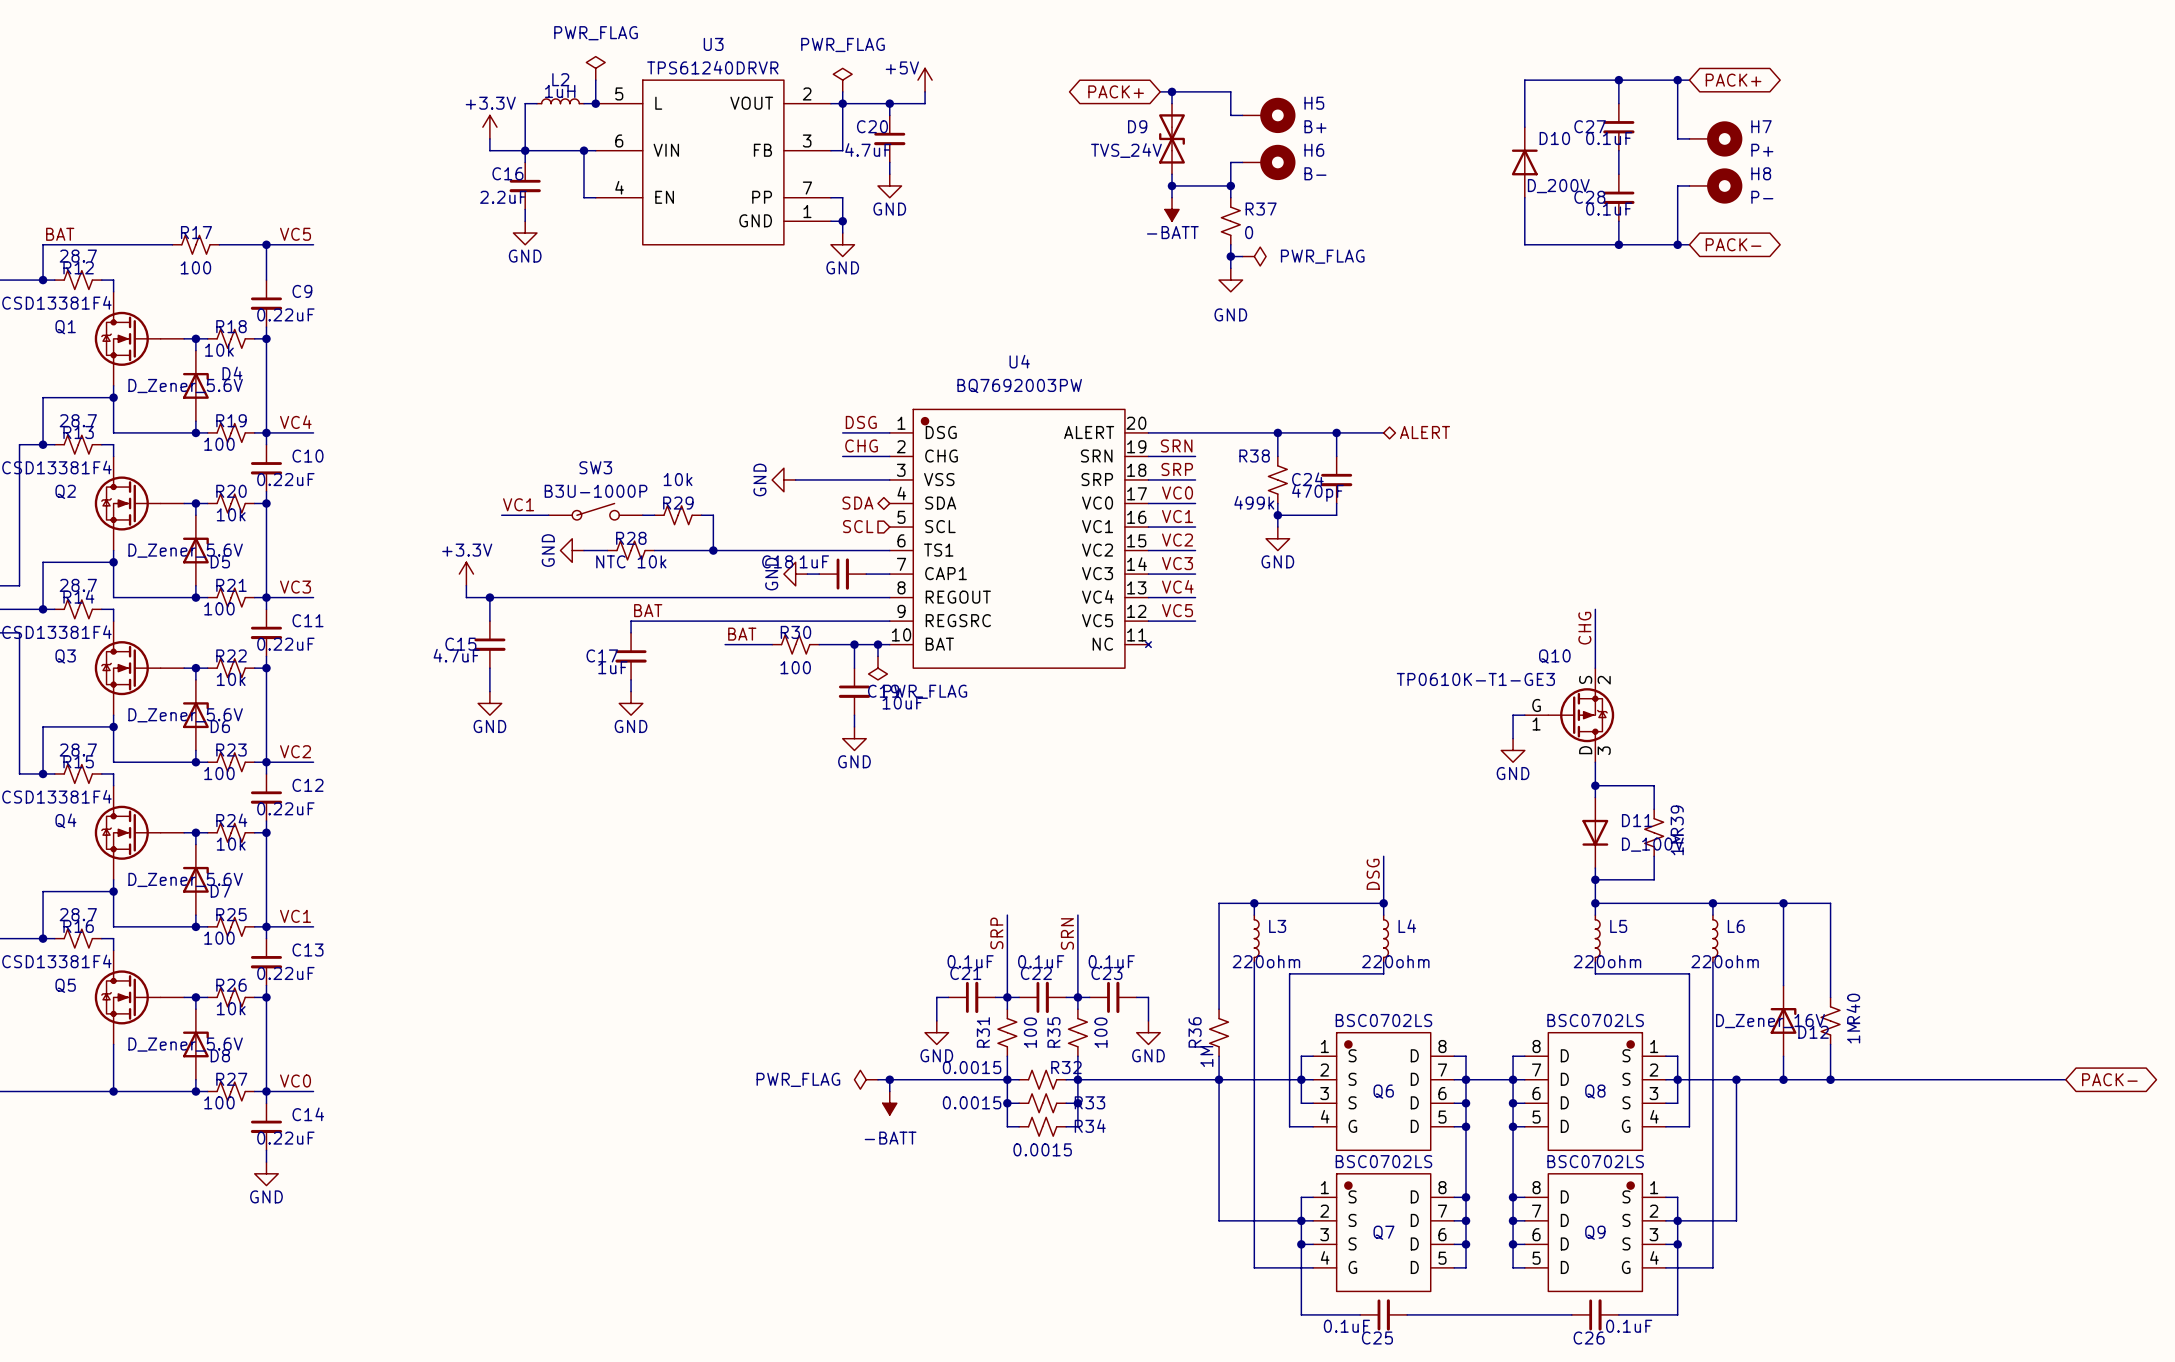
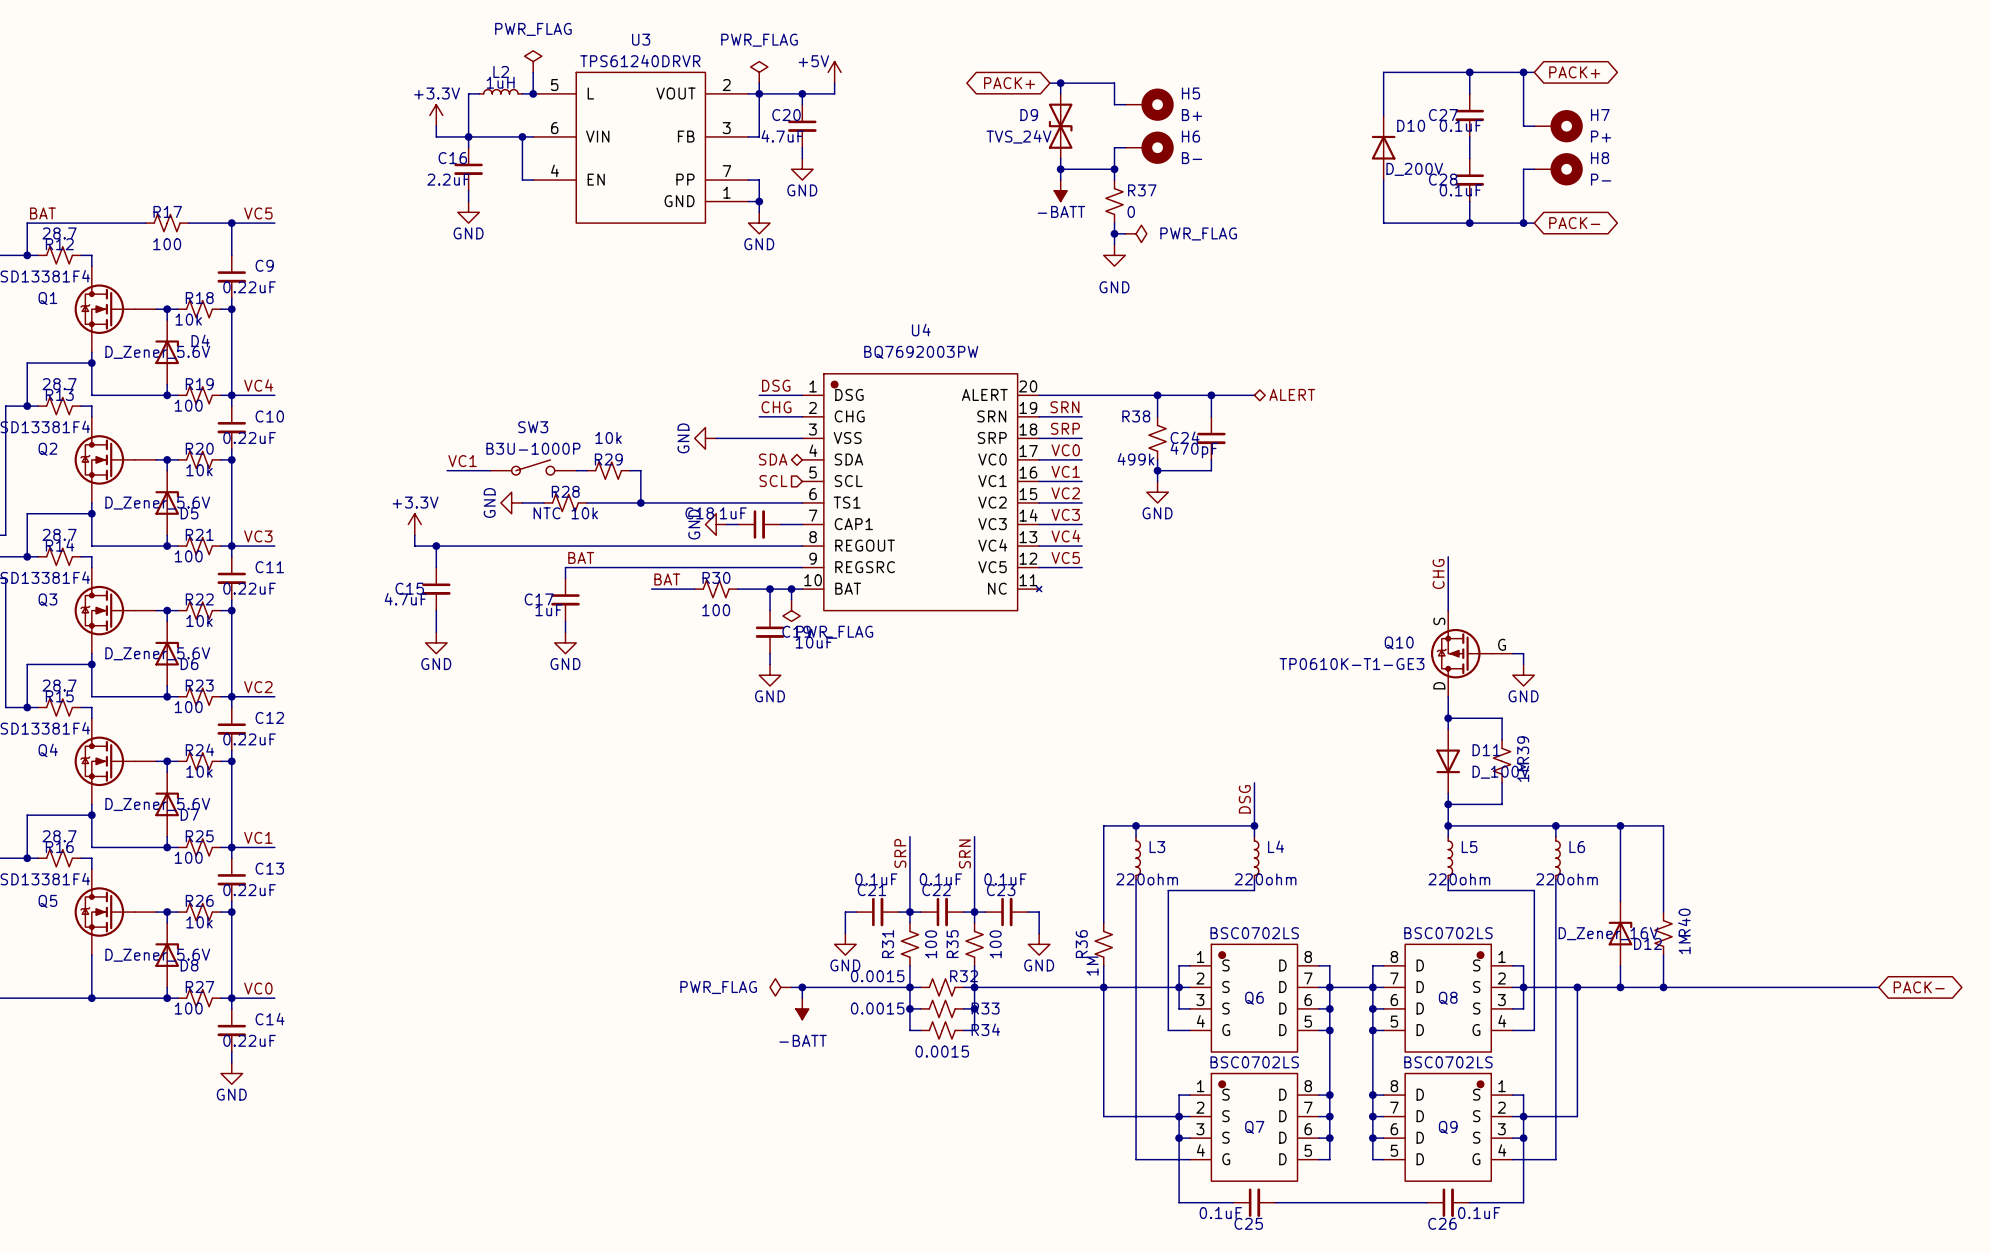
Q10 name position: Q10 (1554, 656) -> Q10 (1399, 643)
Q10 symbol: [1524, 668, 1615, 763] -> [1430, 610, 1513, 697]
Q10 value position: TP0610K-T1-GE3 (1475, 679) -> TP0610K-T1-GE3 (1352, 664)
wire: (1524, 715) (1513, 715) (1513, 738) -> none
wire: none -> (1512, 653) (1523, 653) (1523, 664)
power symbol position: GND (1513, 750) -> GND (1523, 675)

